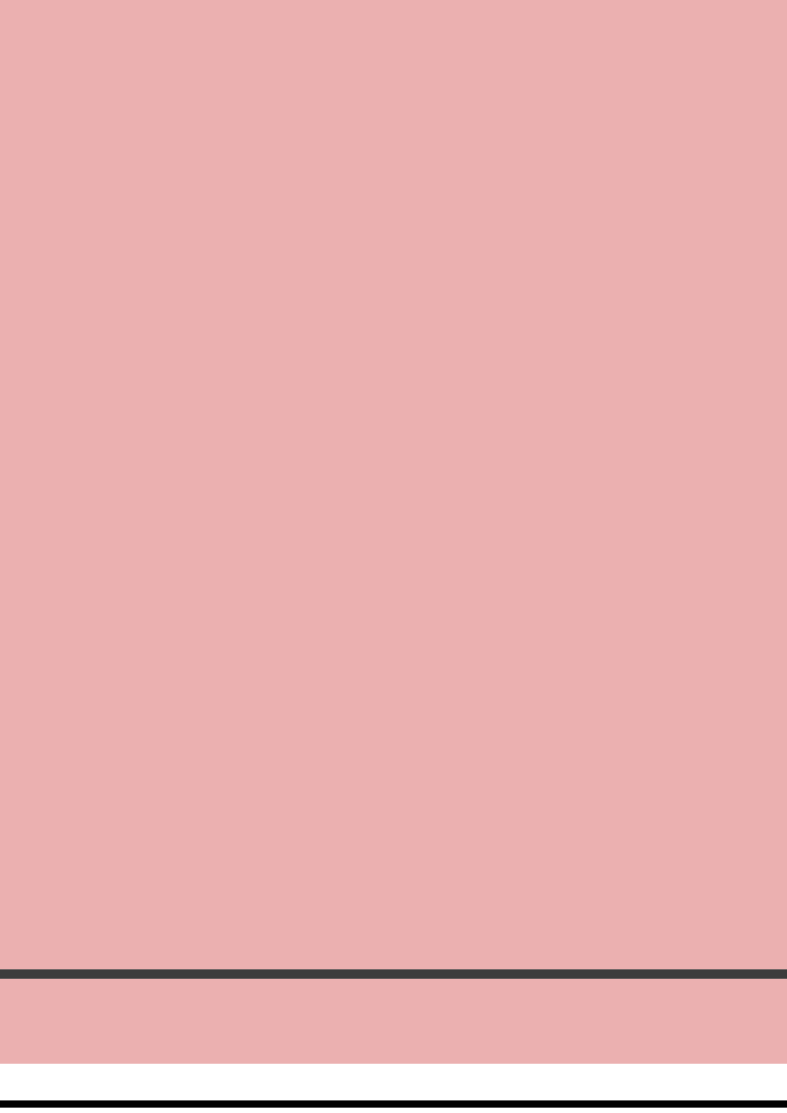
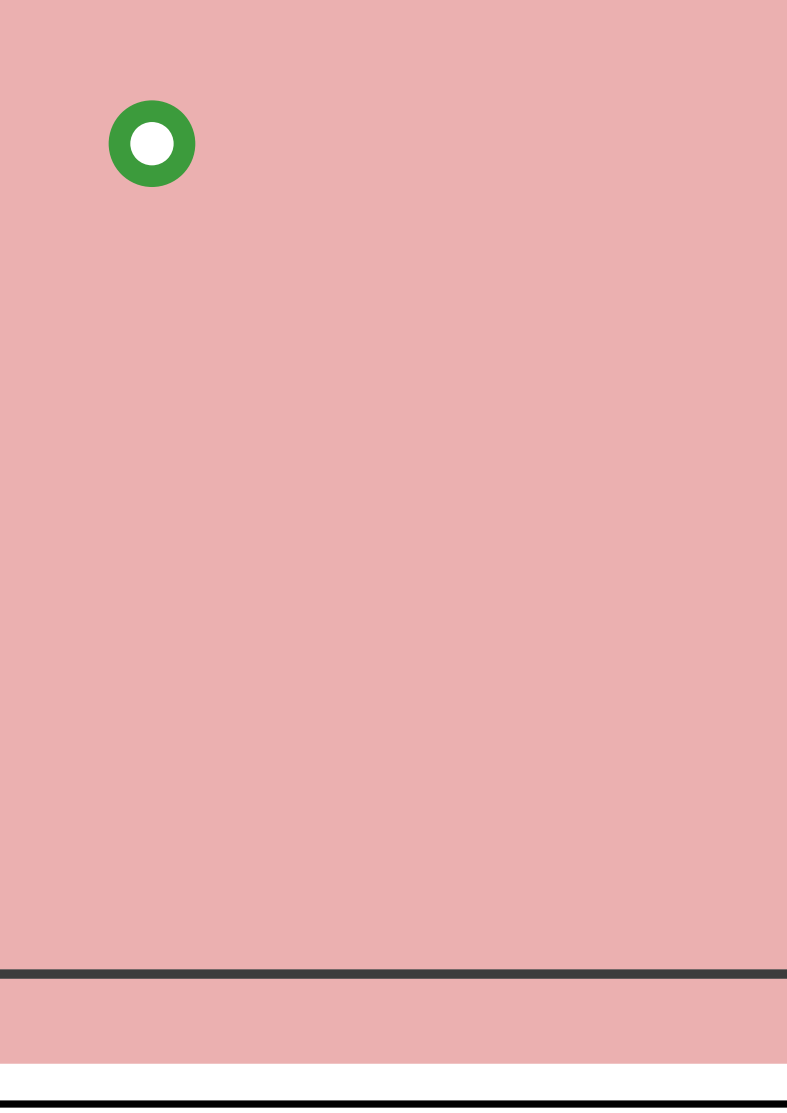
via: none -> (151, 143)

